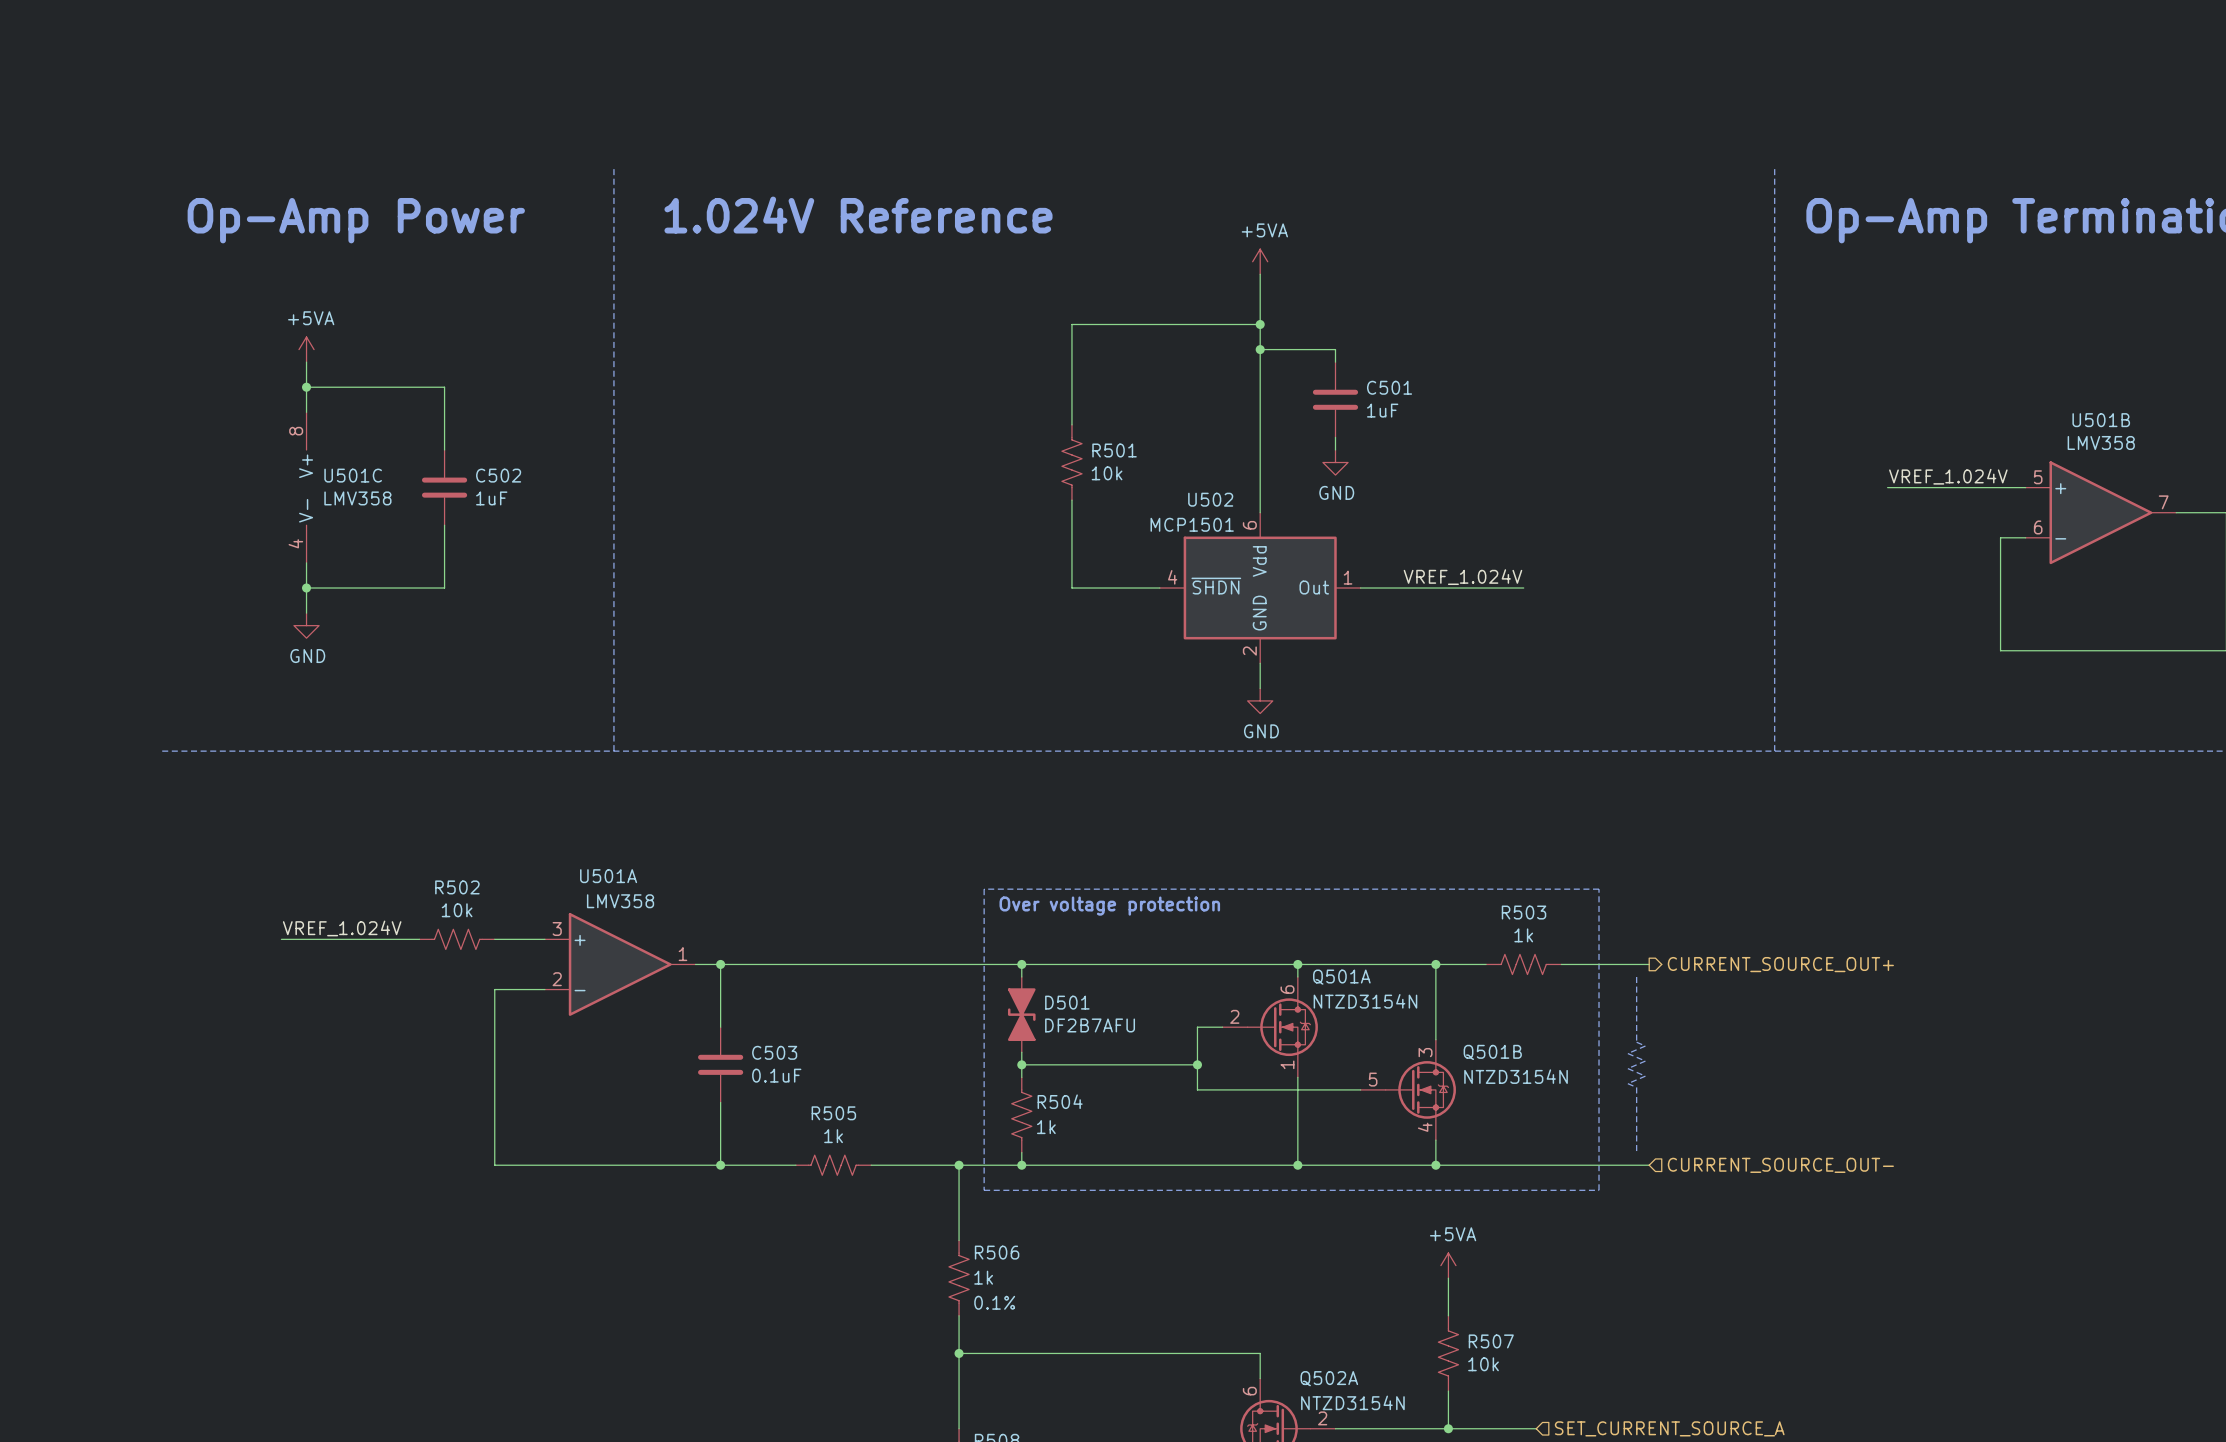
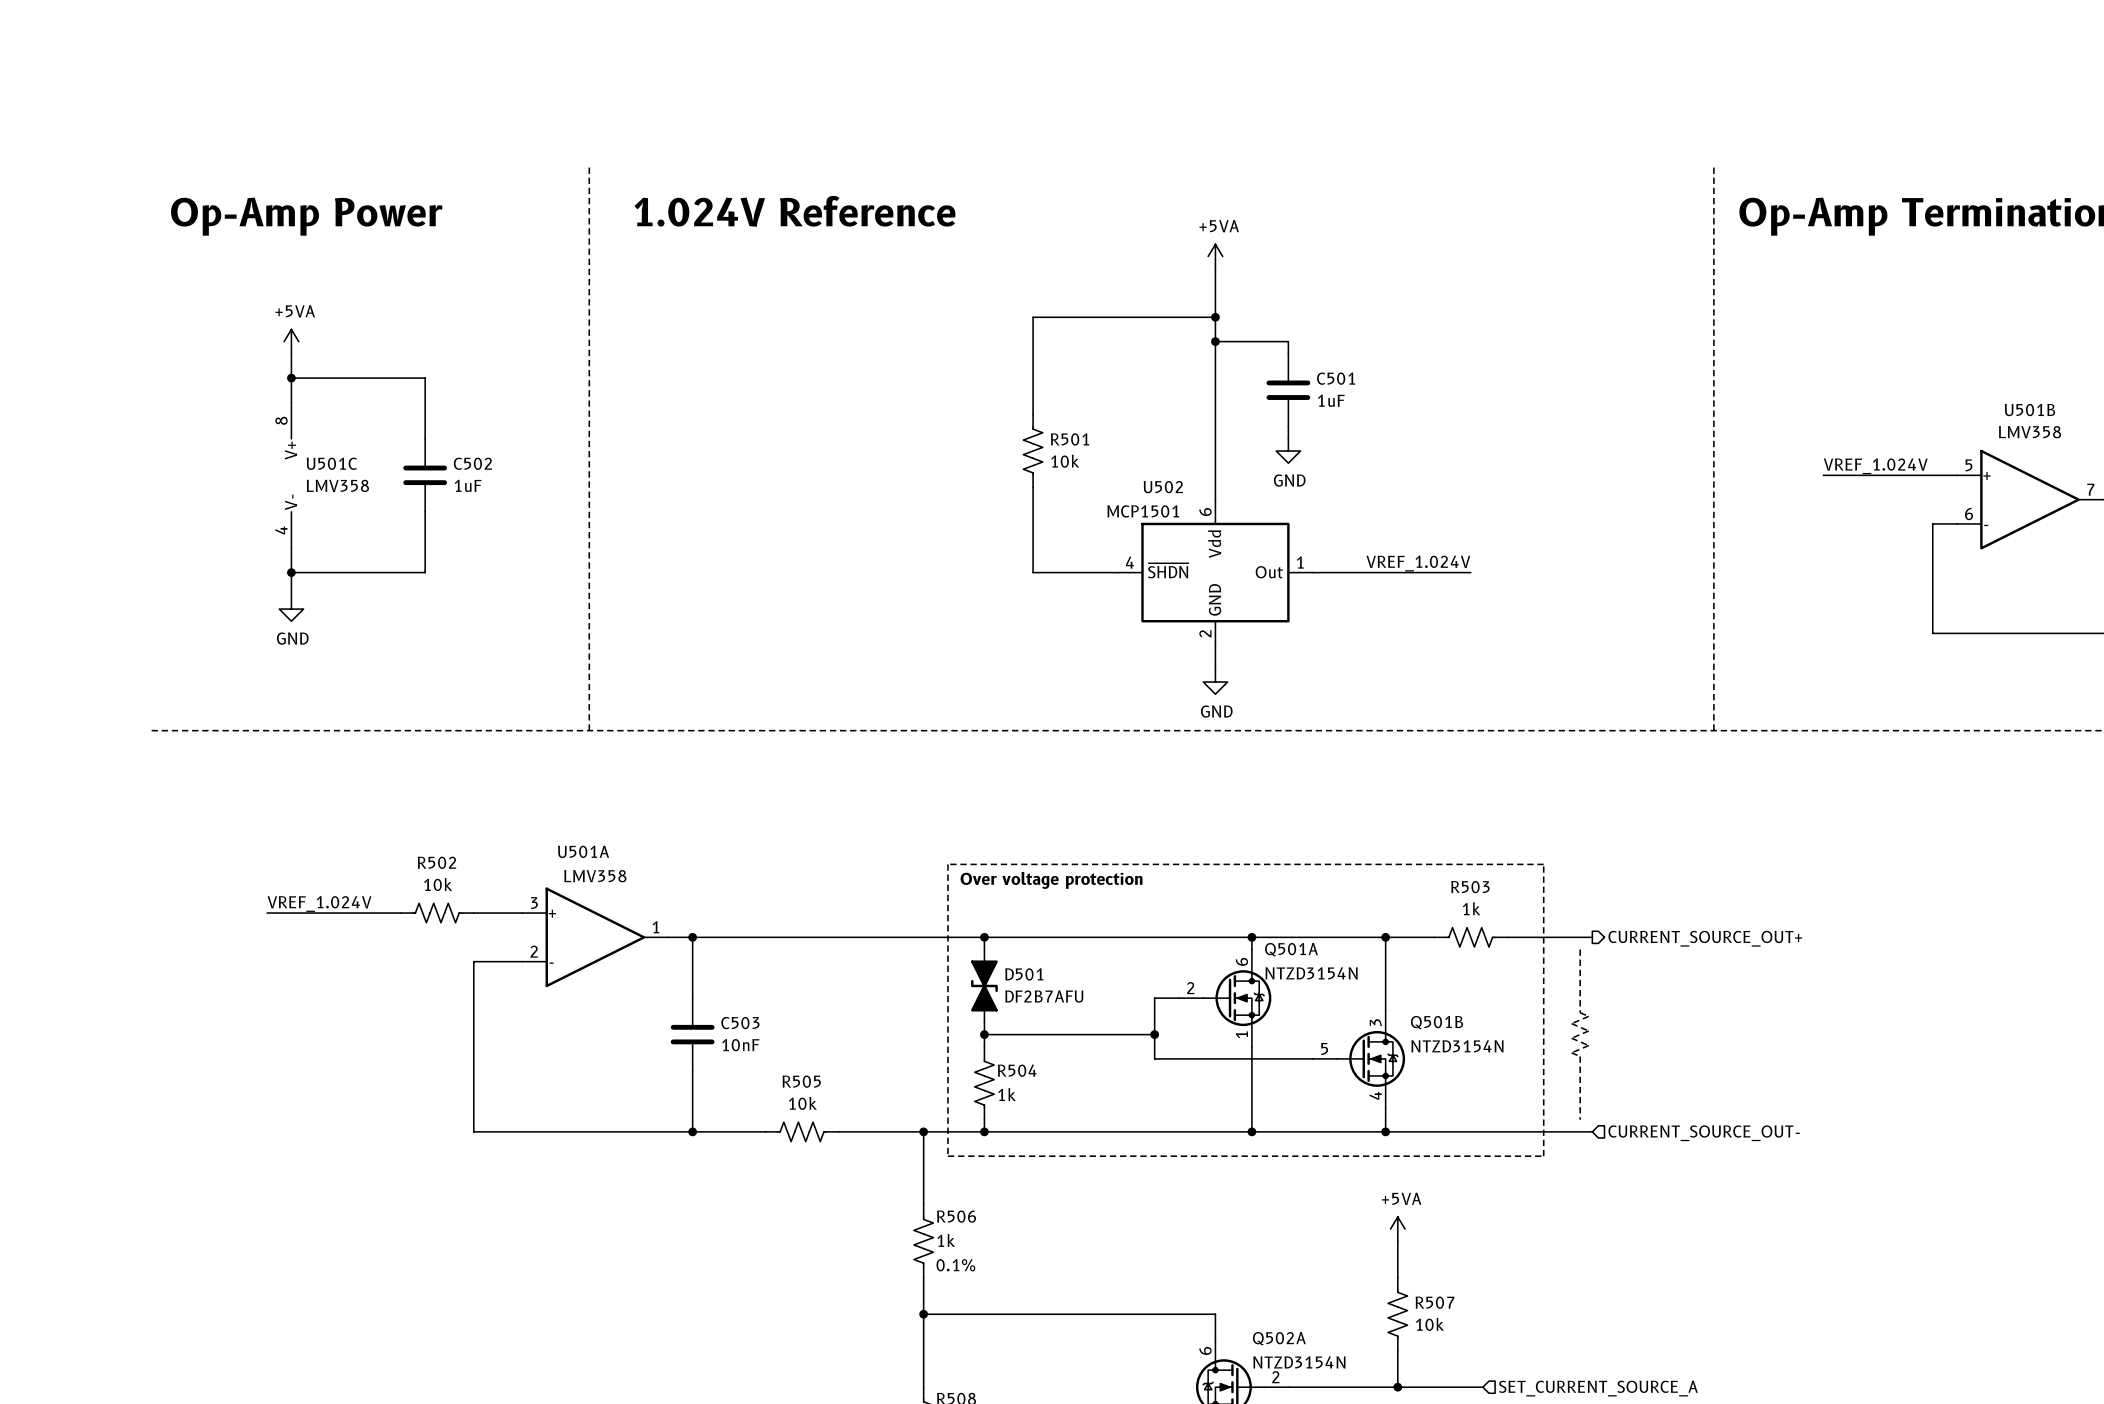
C503 value: 0.1uF (776, 1075) -> 10nF (740, 1045)
R505 value: 1k (833, 1136) -> 10k (802, 1103)

